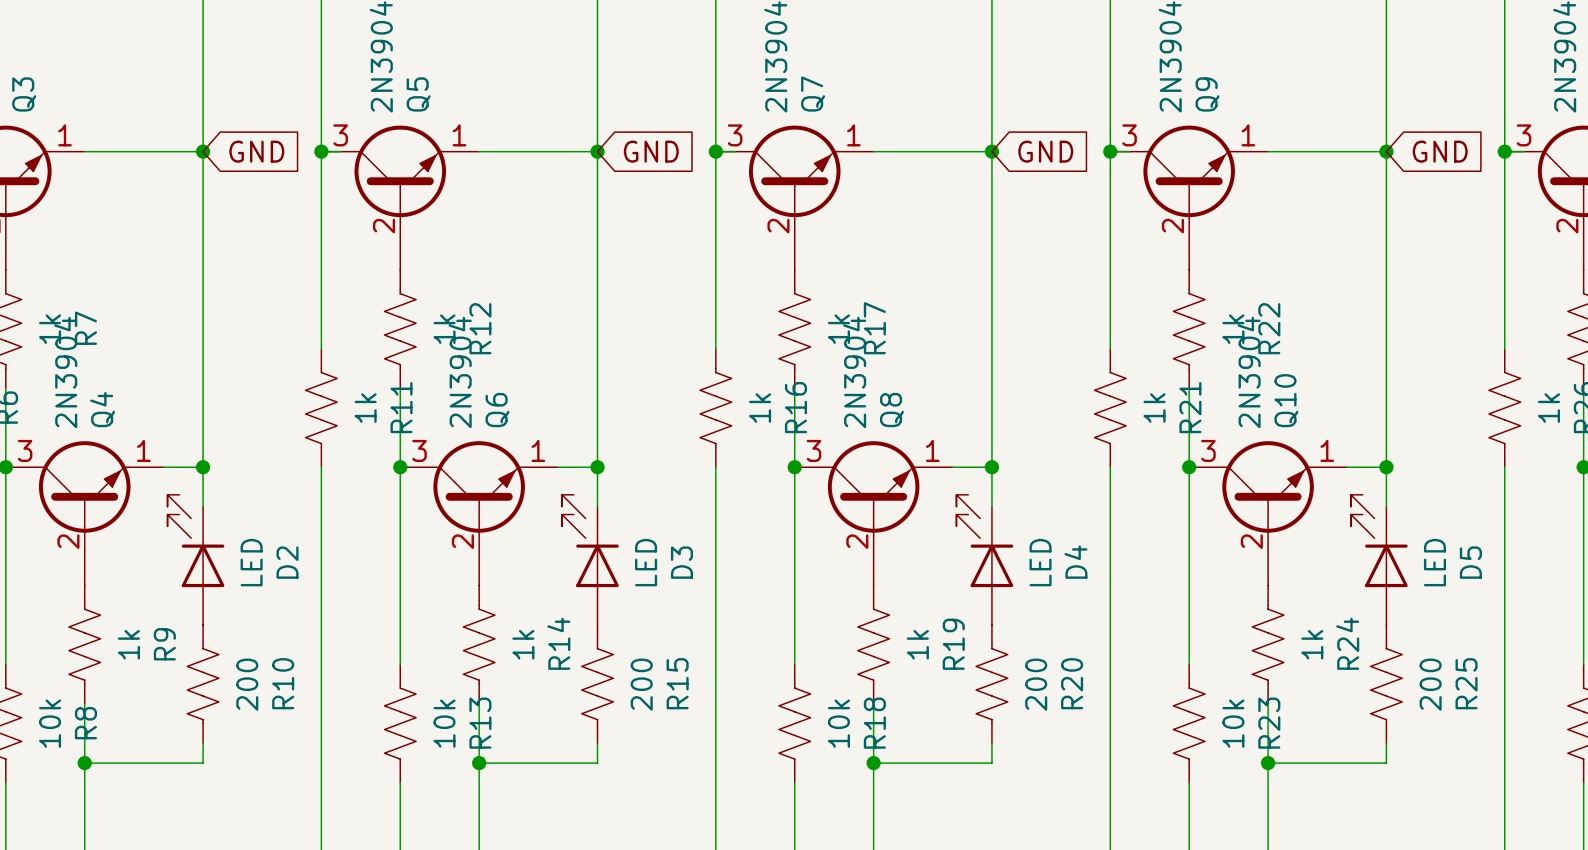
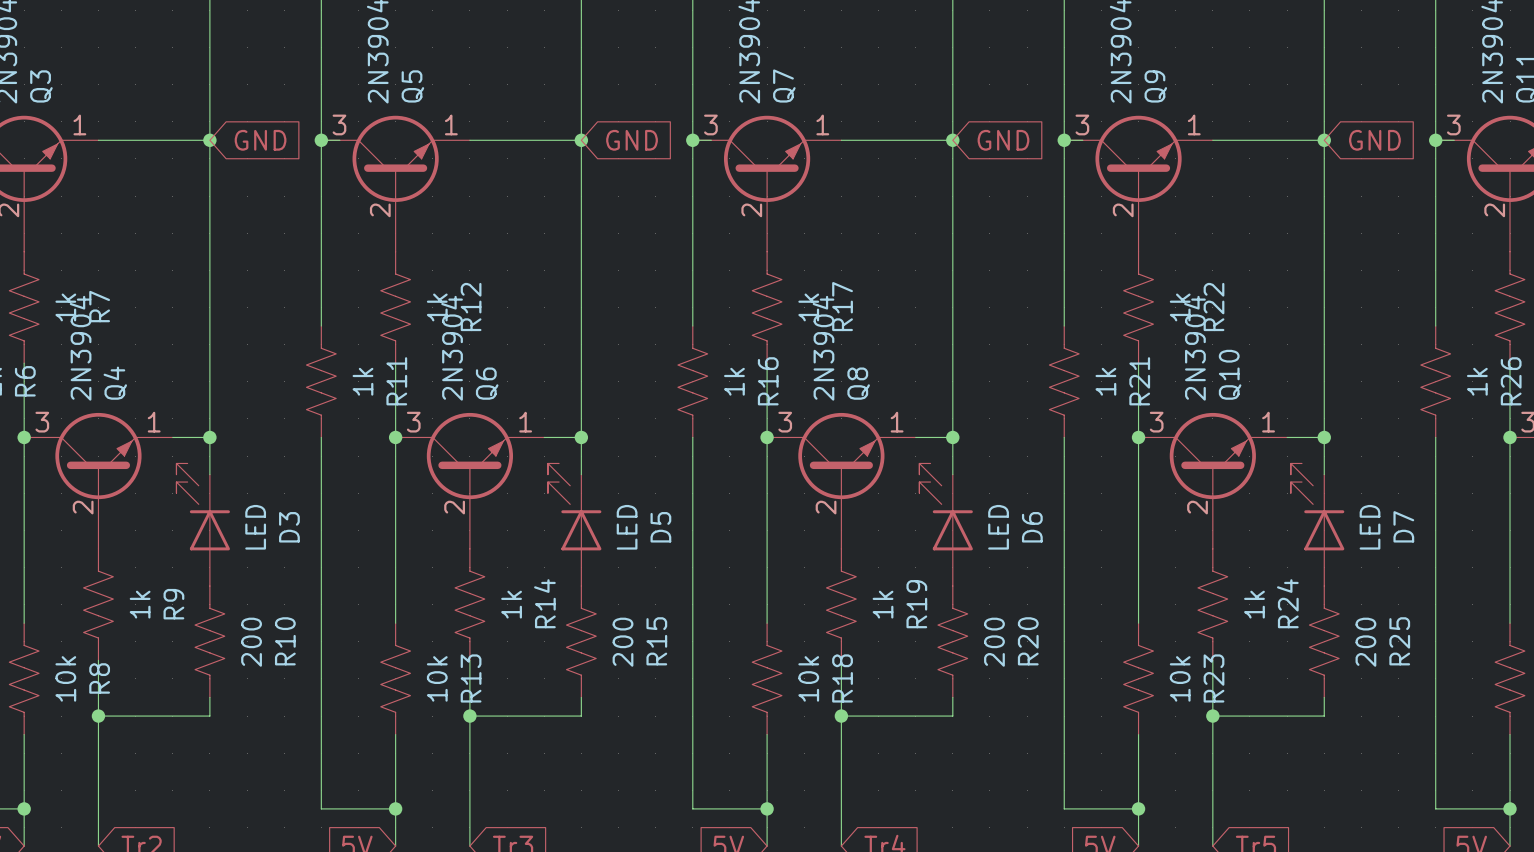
D2 name: D2 (287, 562) -> D3 (289, 527)
D3 name: D3 (681, 562) -> D5 (660, 527)
D4 name: D4 (1075, 562) -> D6 (1032, 527)
D5 name: D5 (1470, 562) -> D7 (1403, 526)

